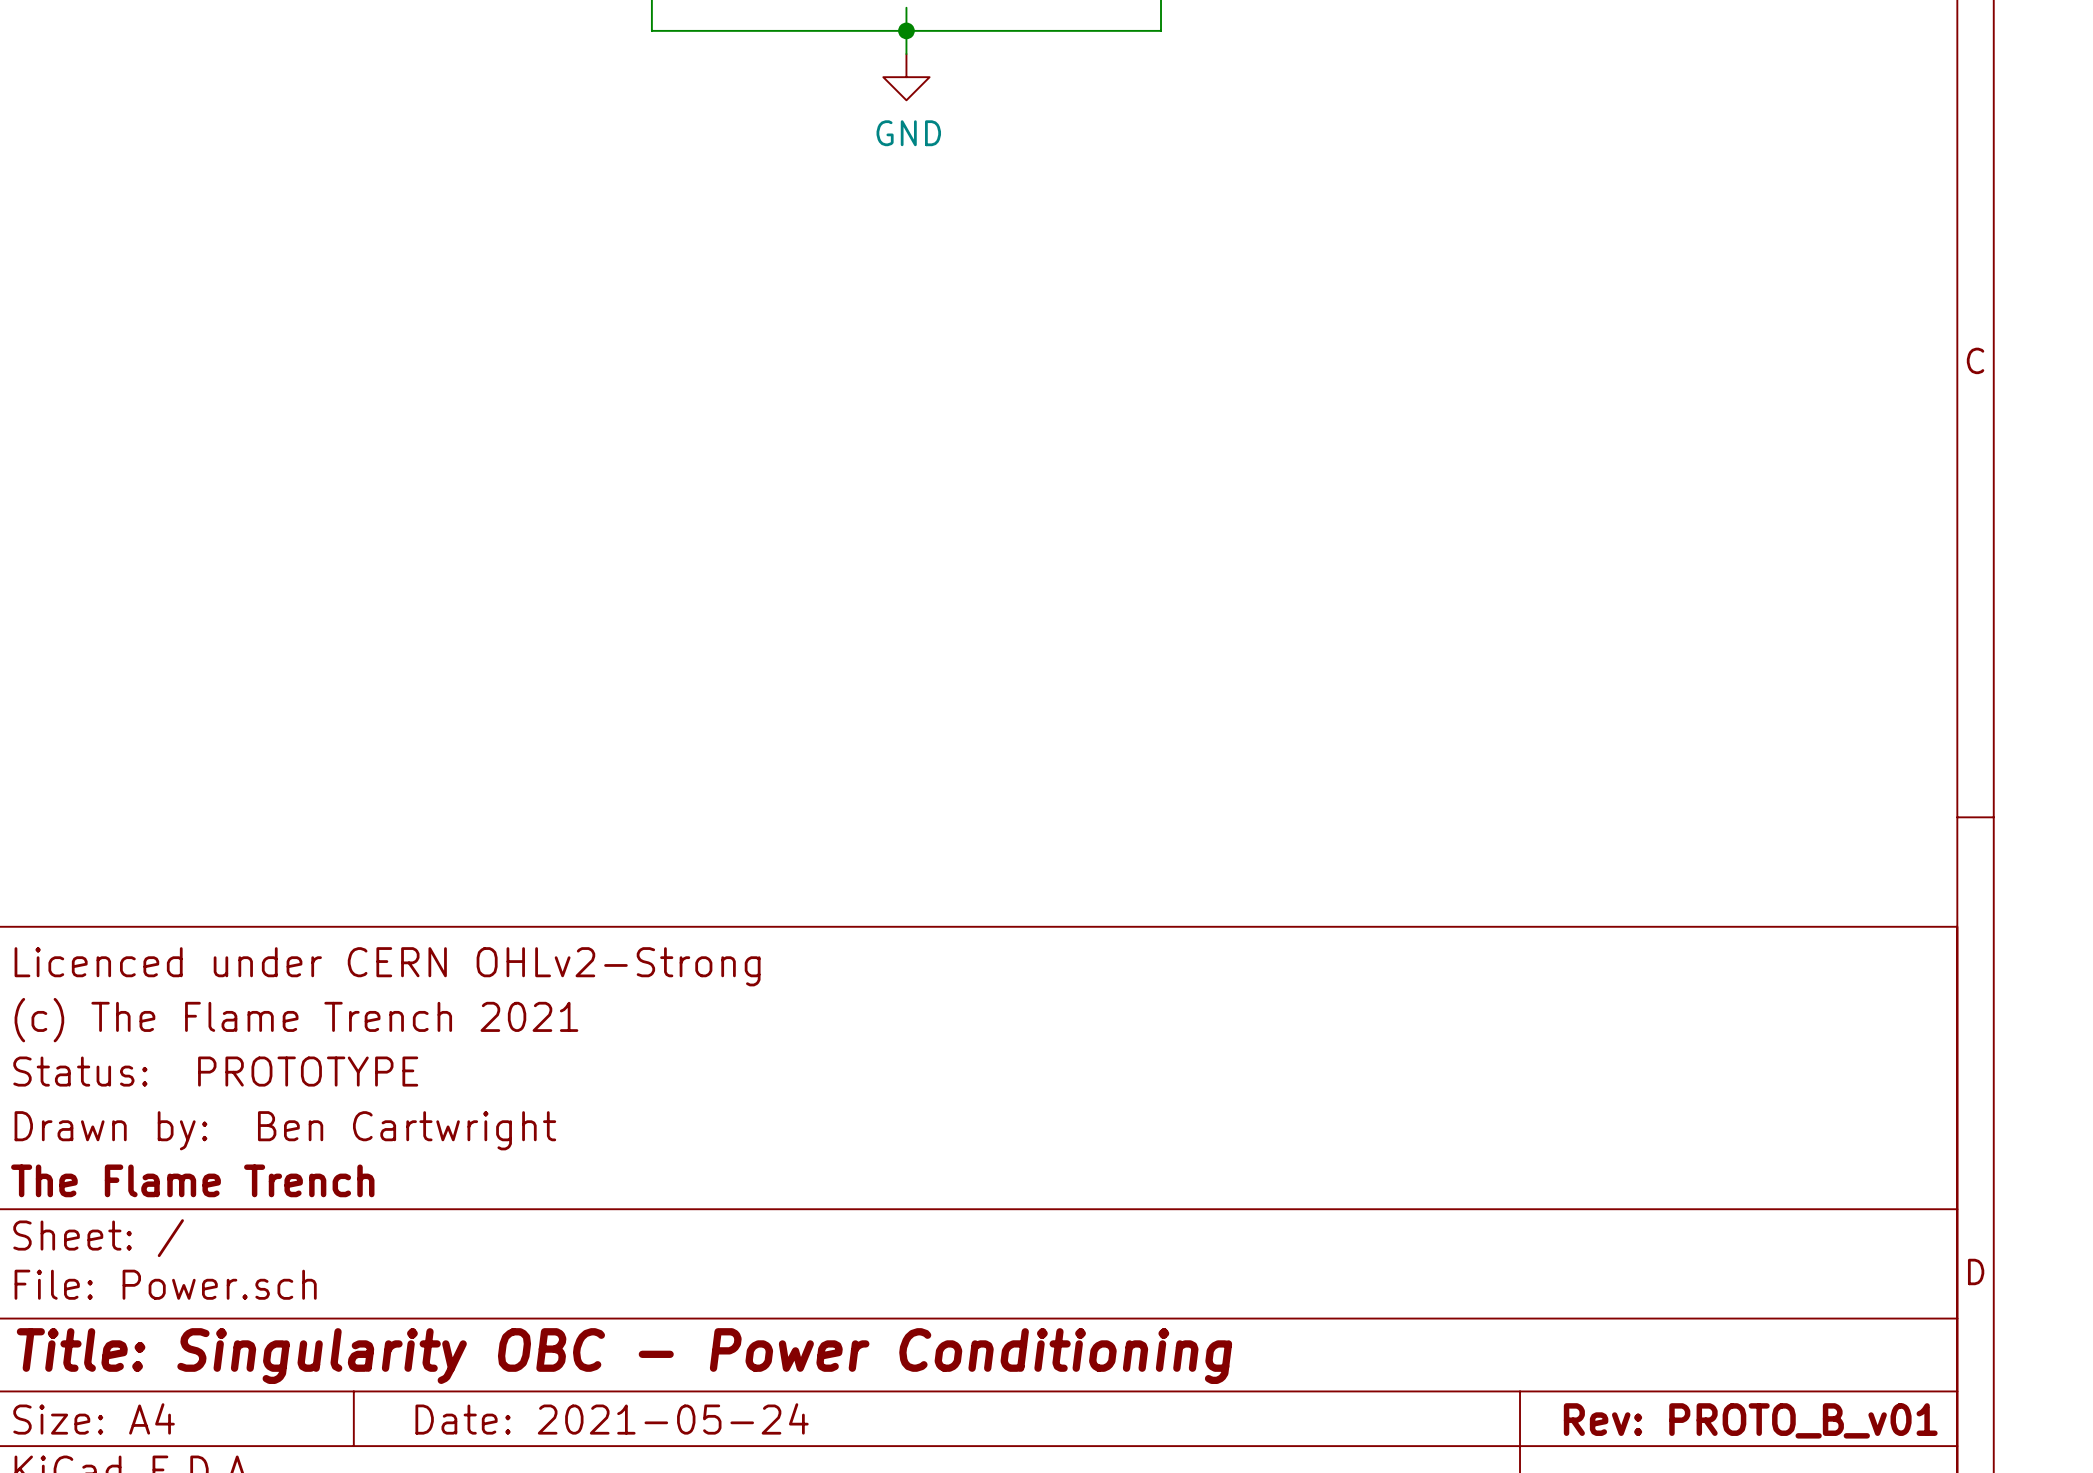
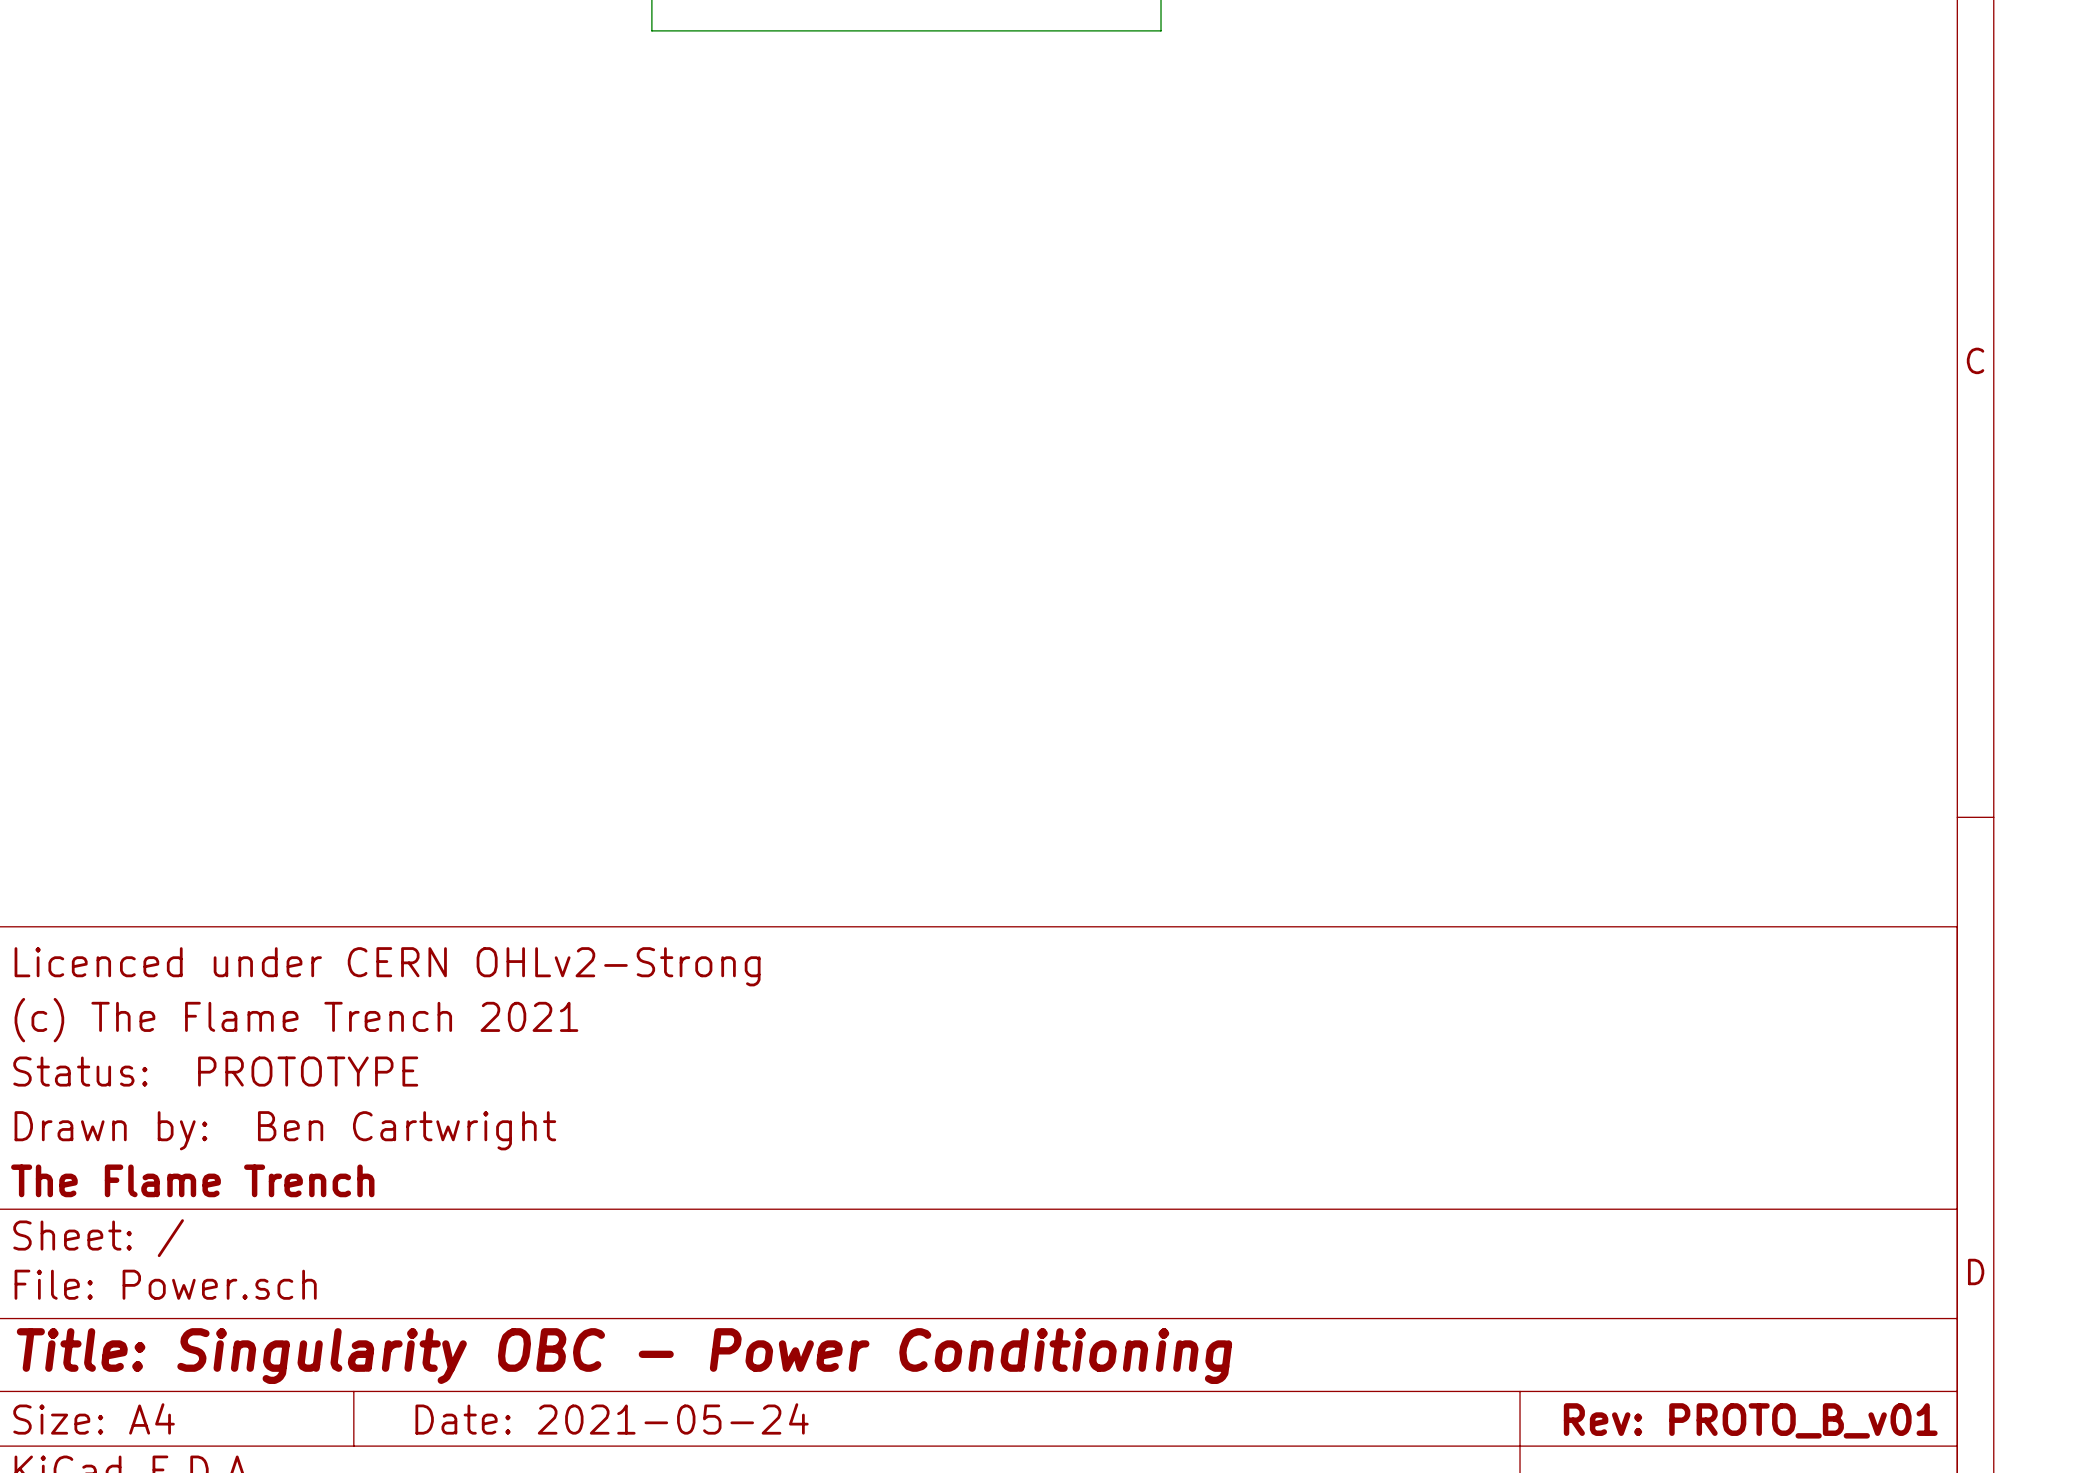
wire: (906, 7) (906, 54) -> none
junction: (906, 30) -> none
power symbol: GND (906, 77) -> none

